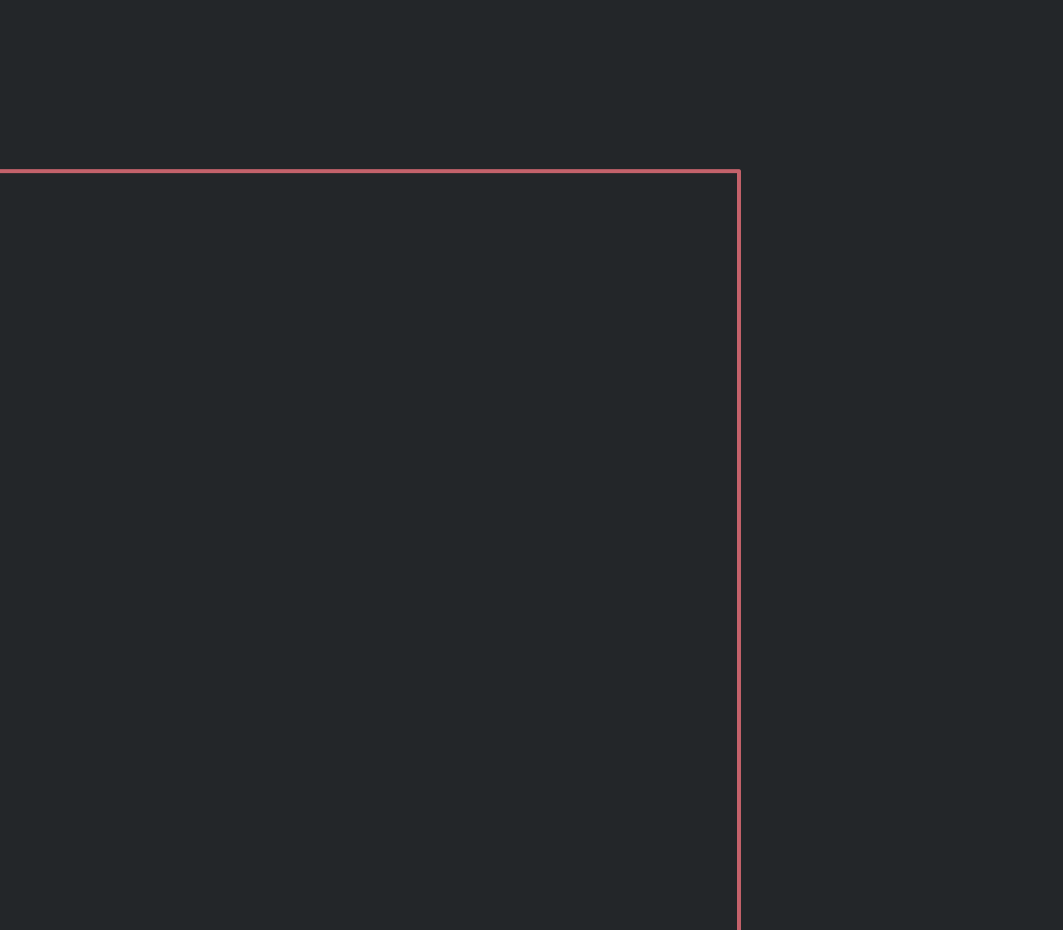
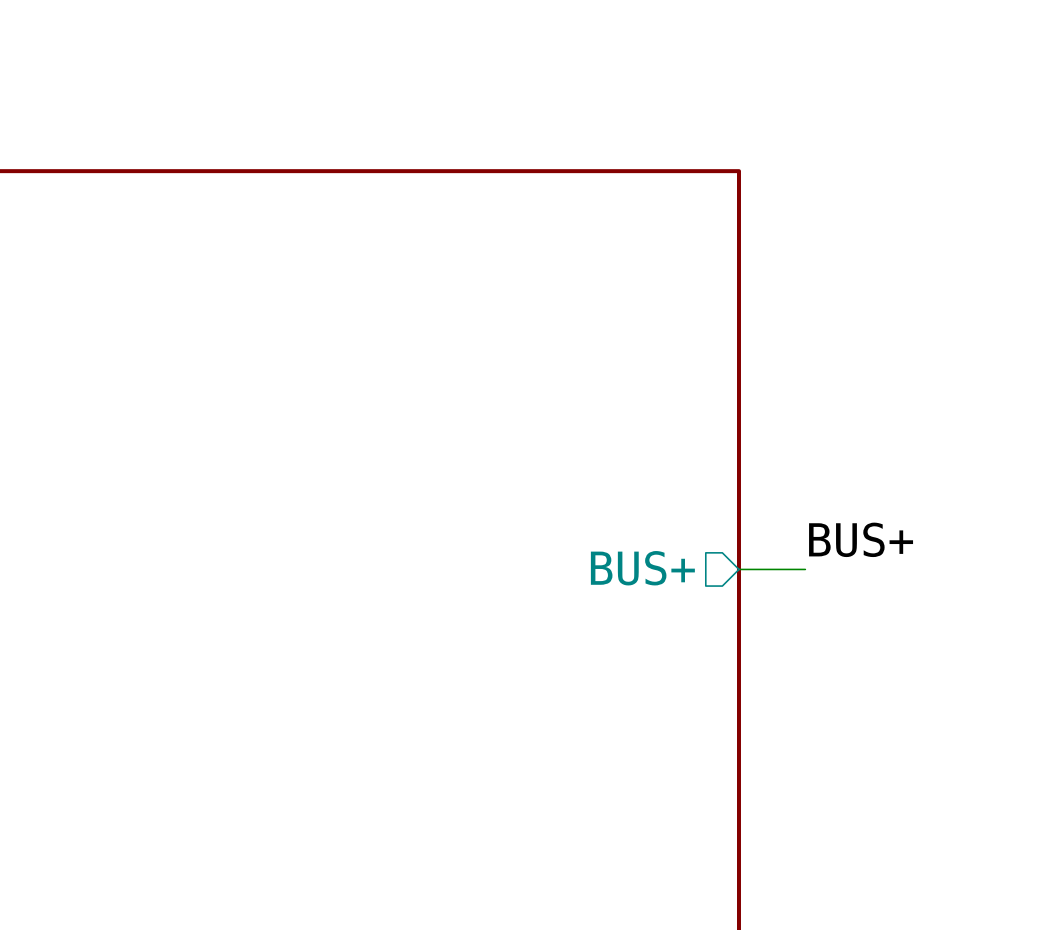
label: none -> BUS+ (861, 539)
sheet pin: none -> BUS+ (642, 568)
wire: none -> (738, 569) (805, 569)

